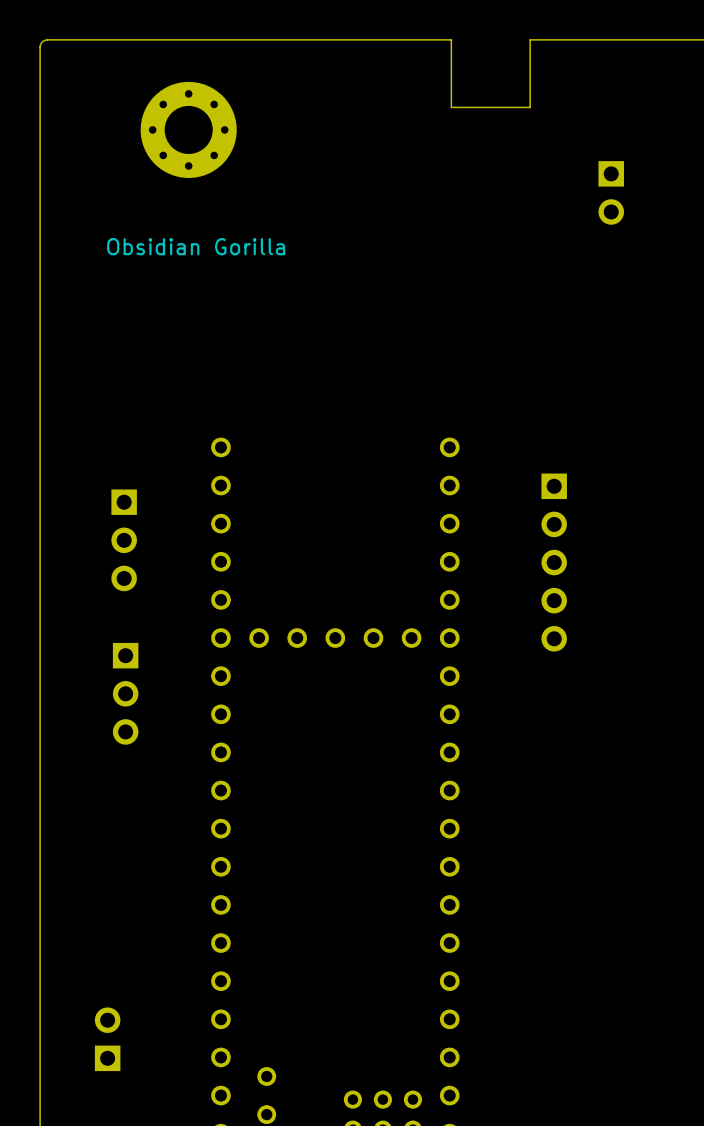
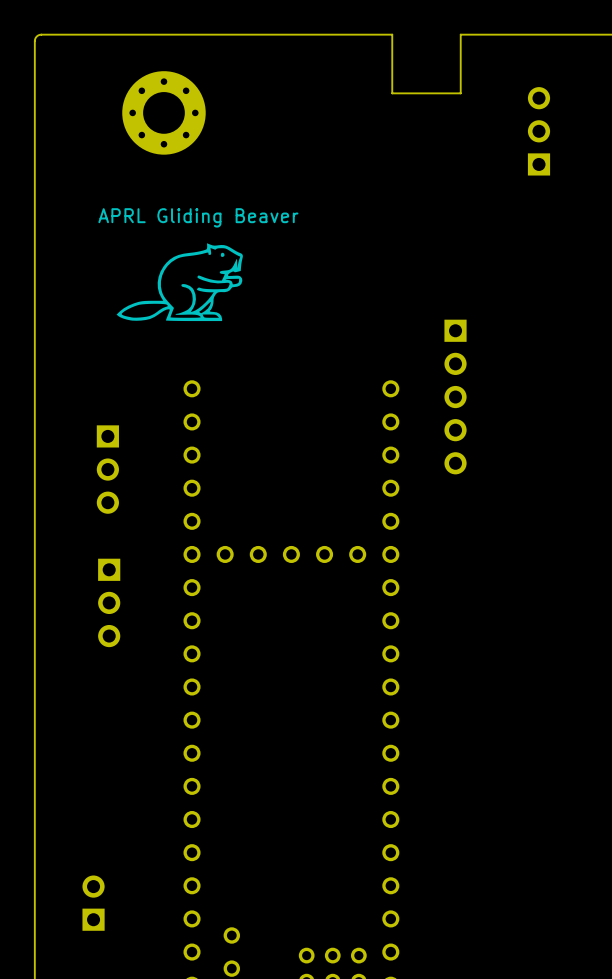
part: none -> (539, 131)
part: (611, 192) -> none
text: Obsidian Gorilla (196, 246) -> APRL Gliding Beaver (198, 217)
drawing: none -> [116, 243, 243, 322]
part position: (554, 562) -> (455, 397)

